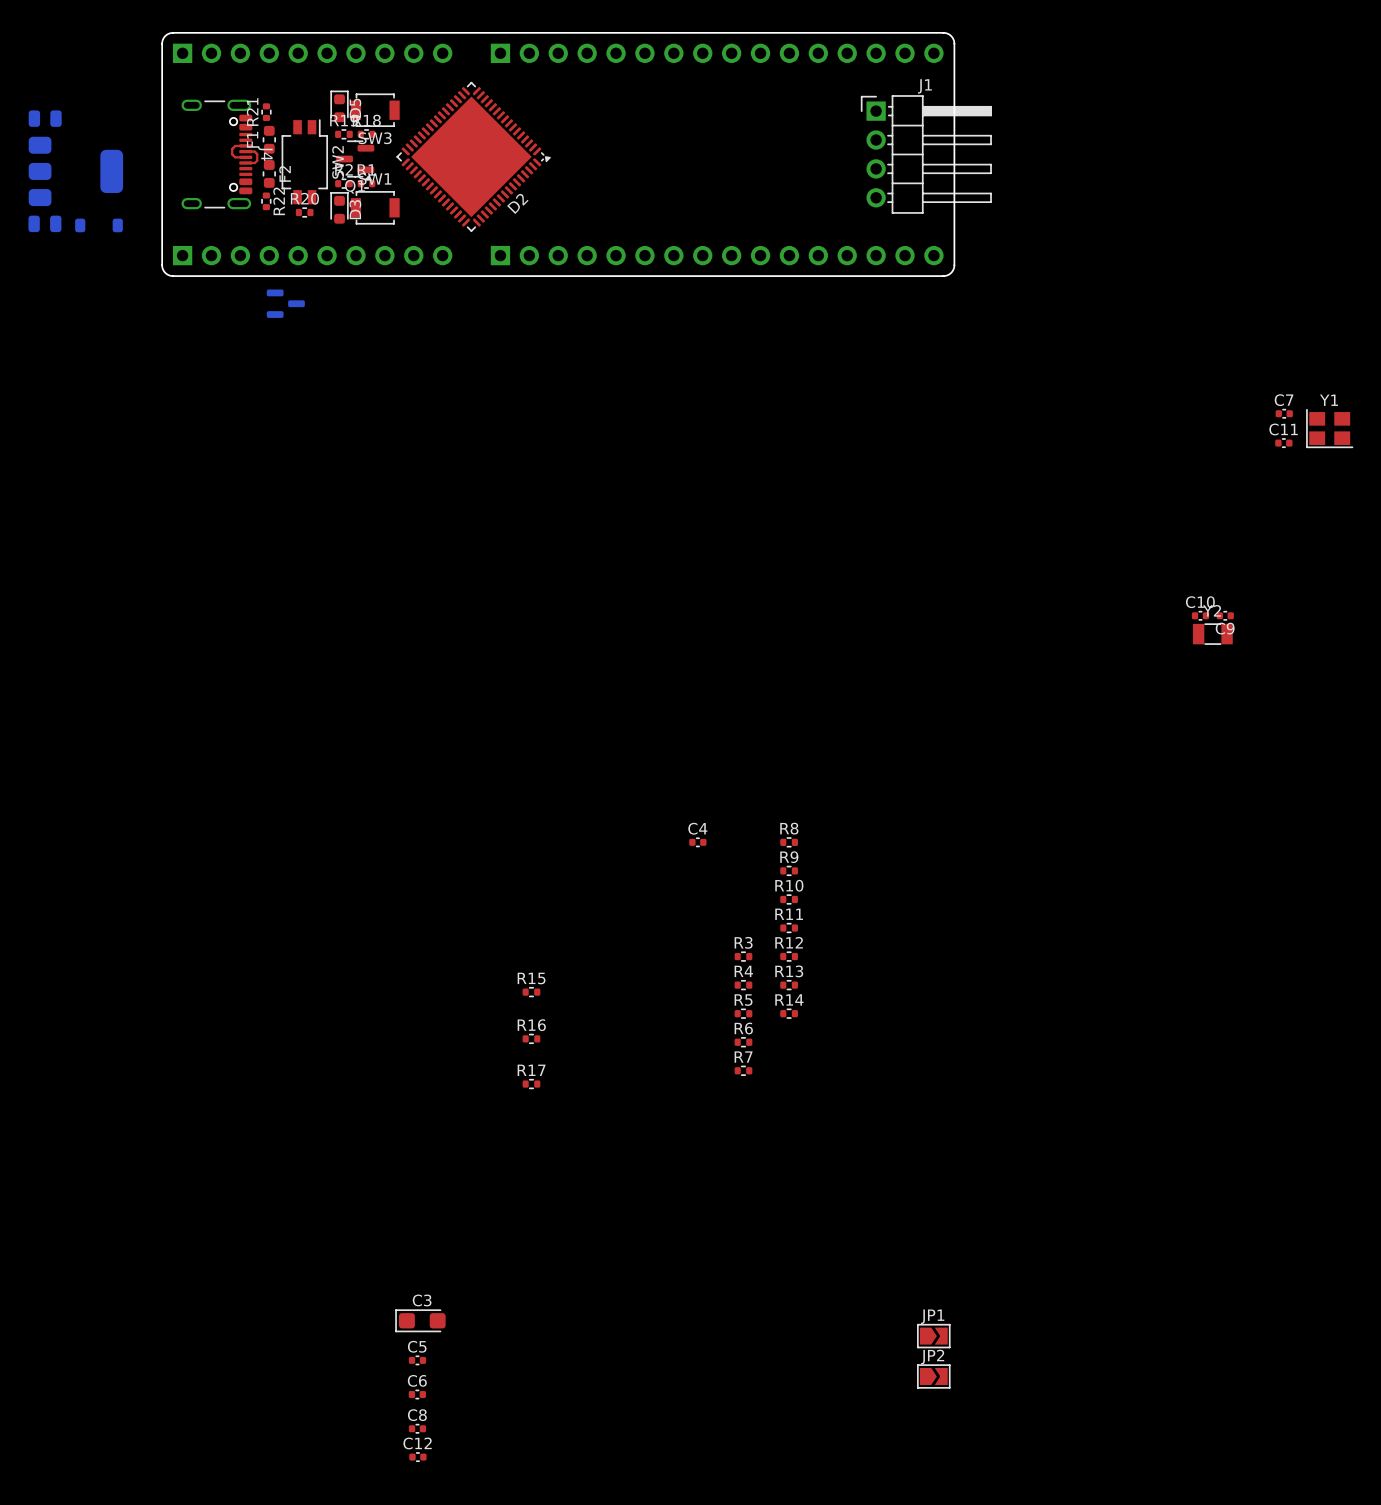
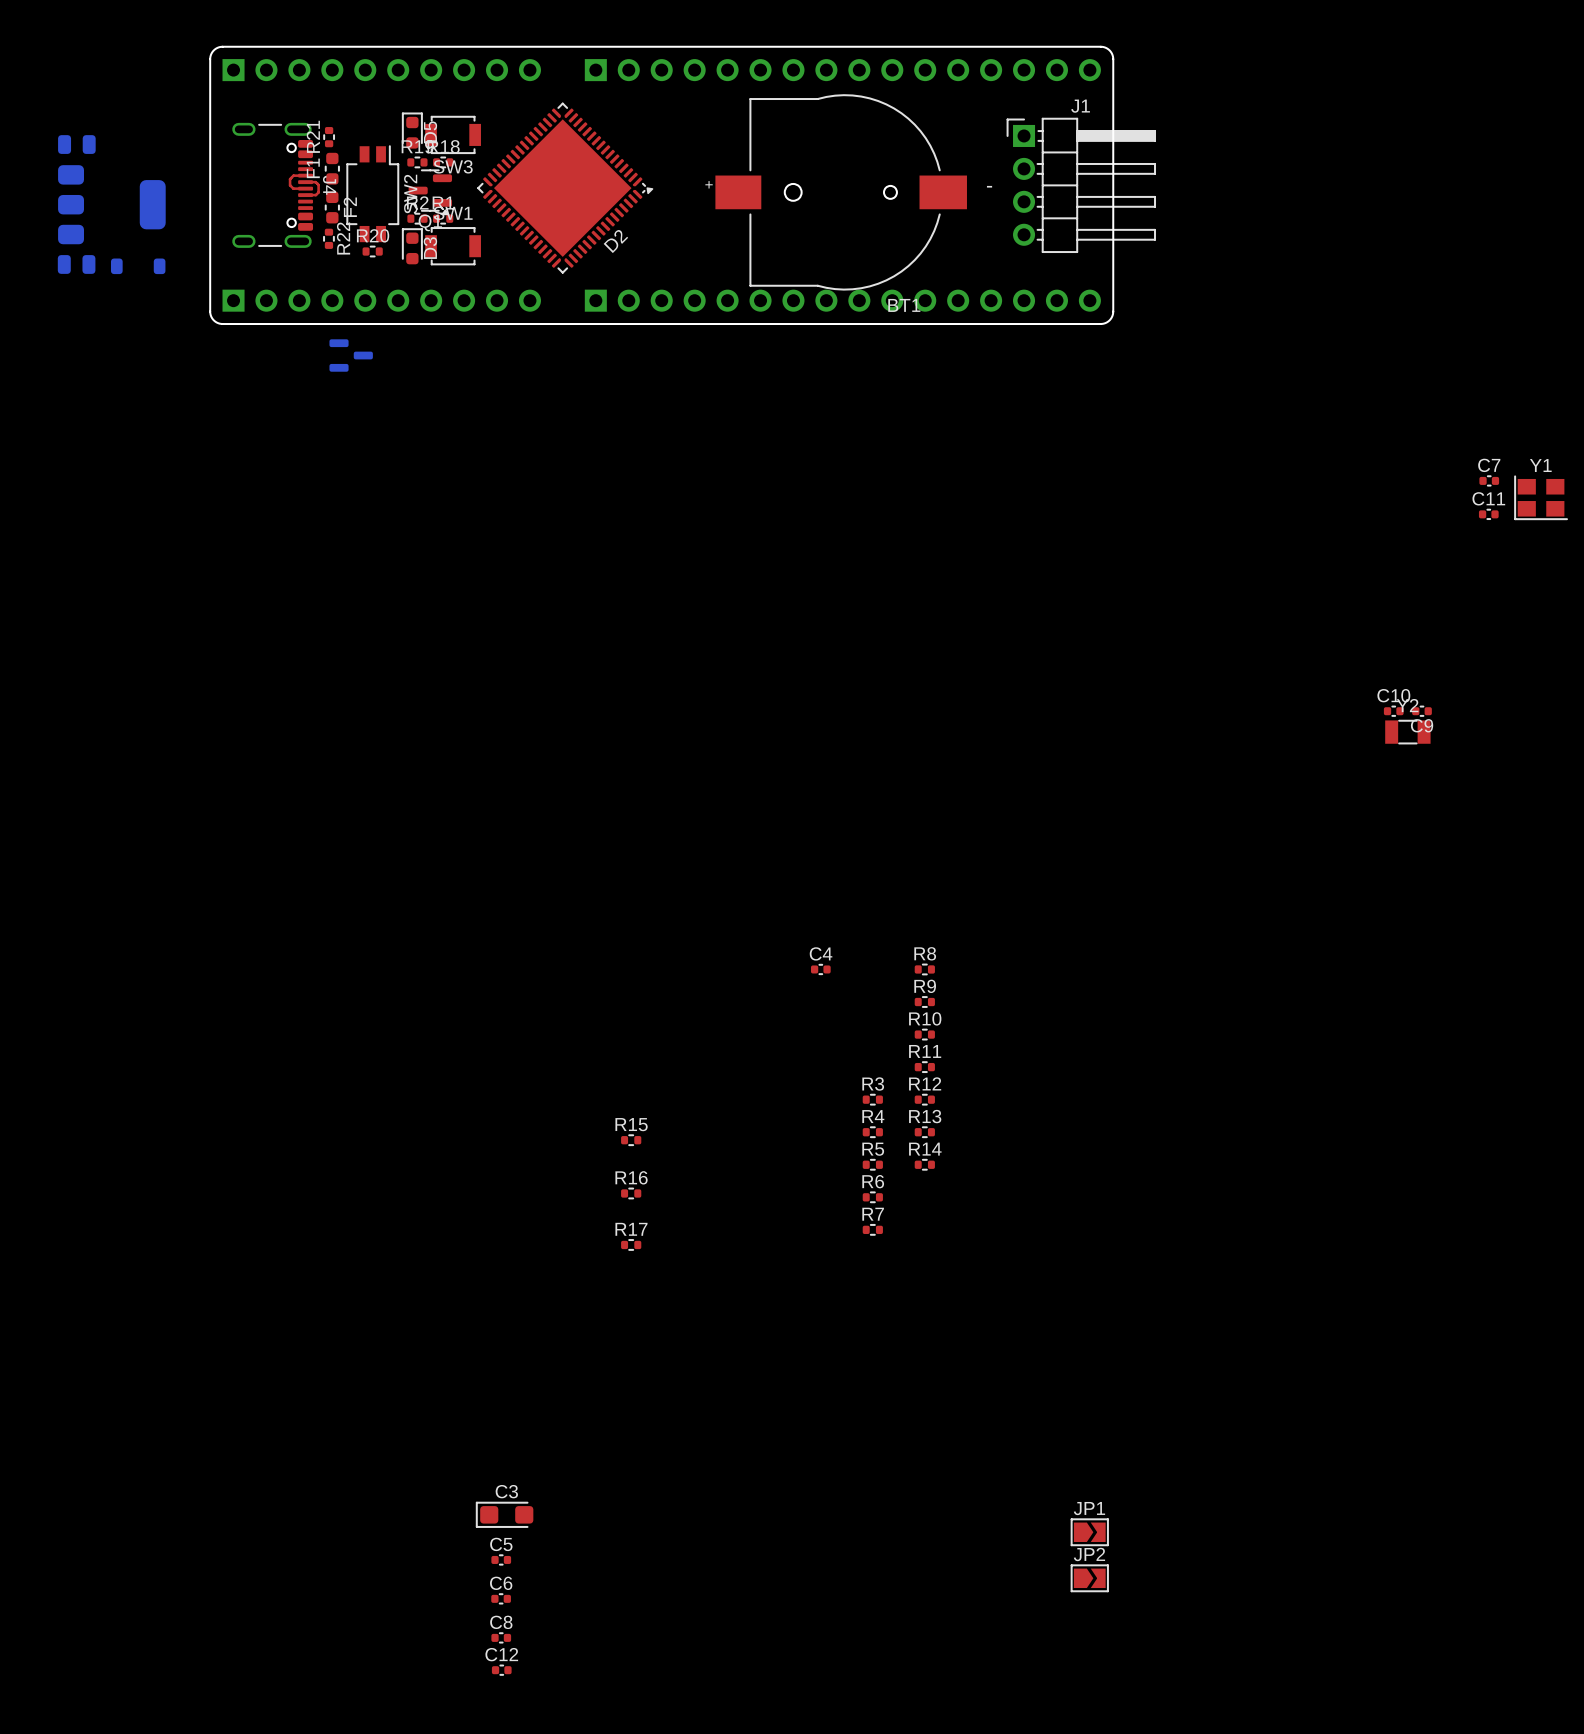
BT1: none -> (841, 192)

